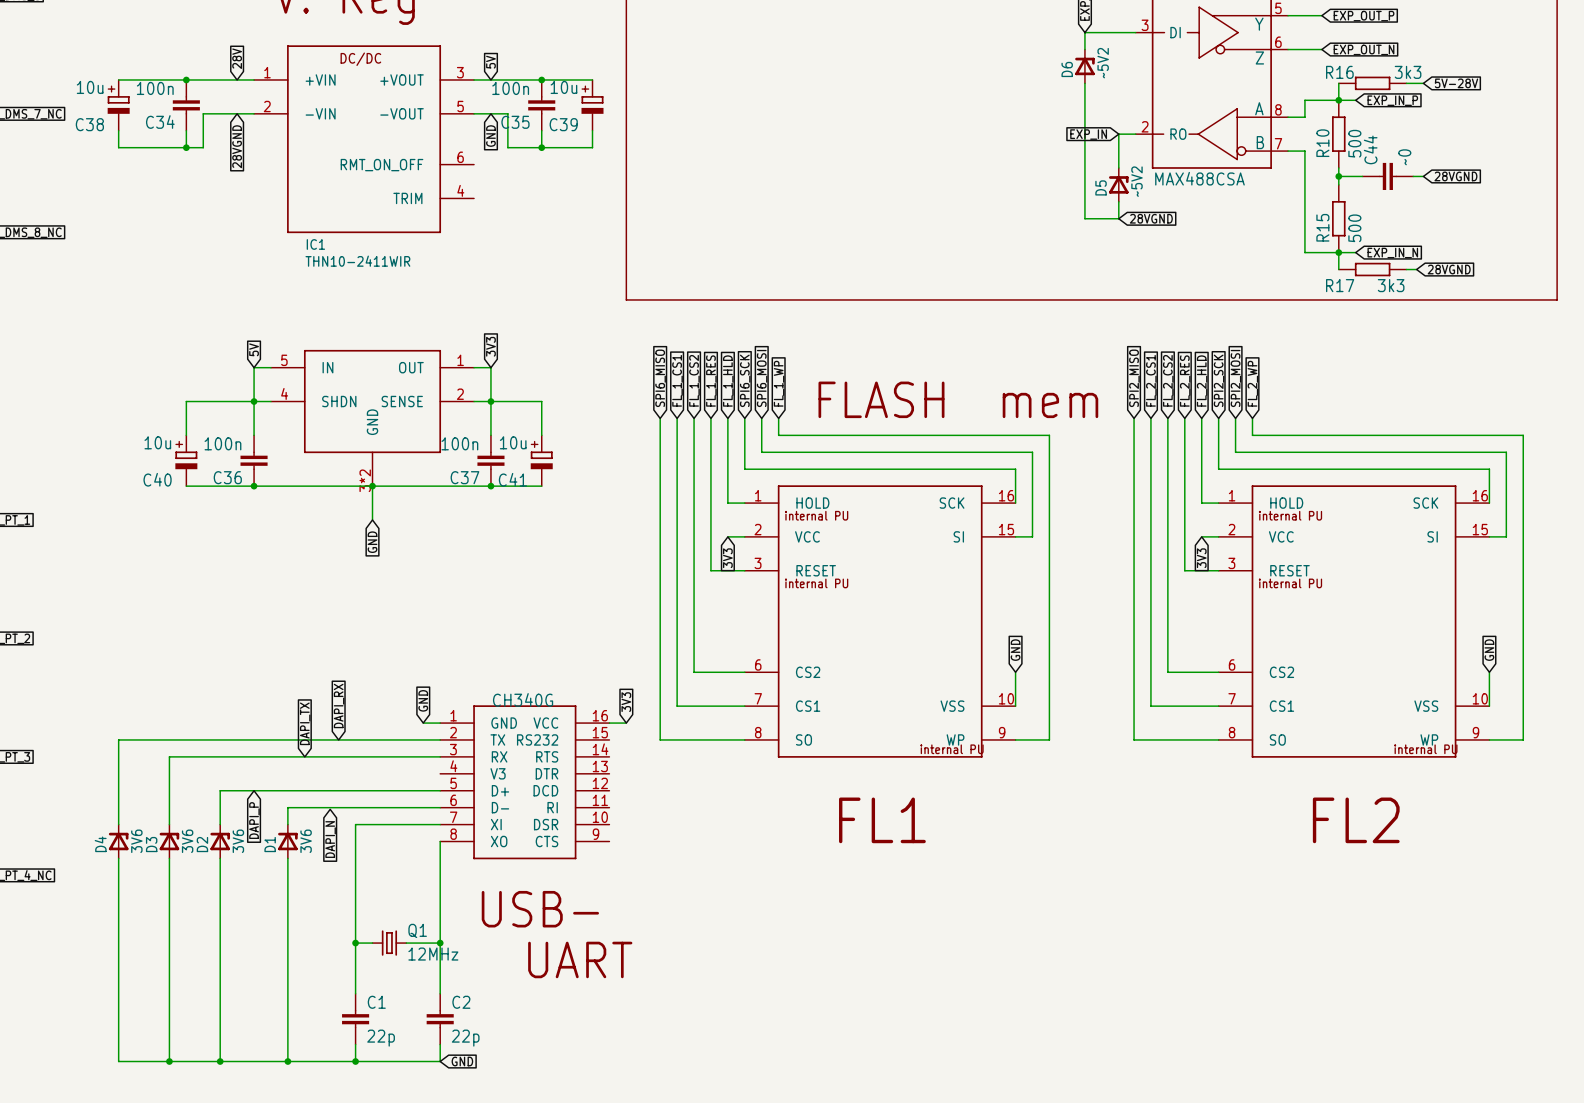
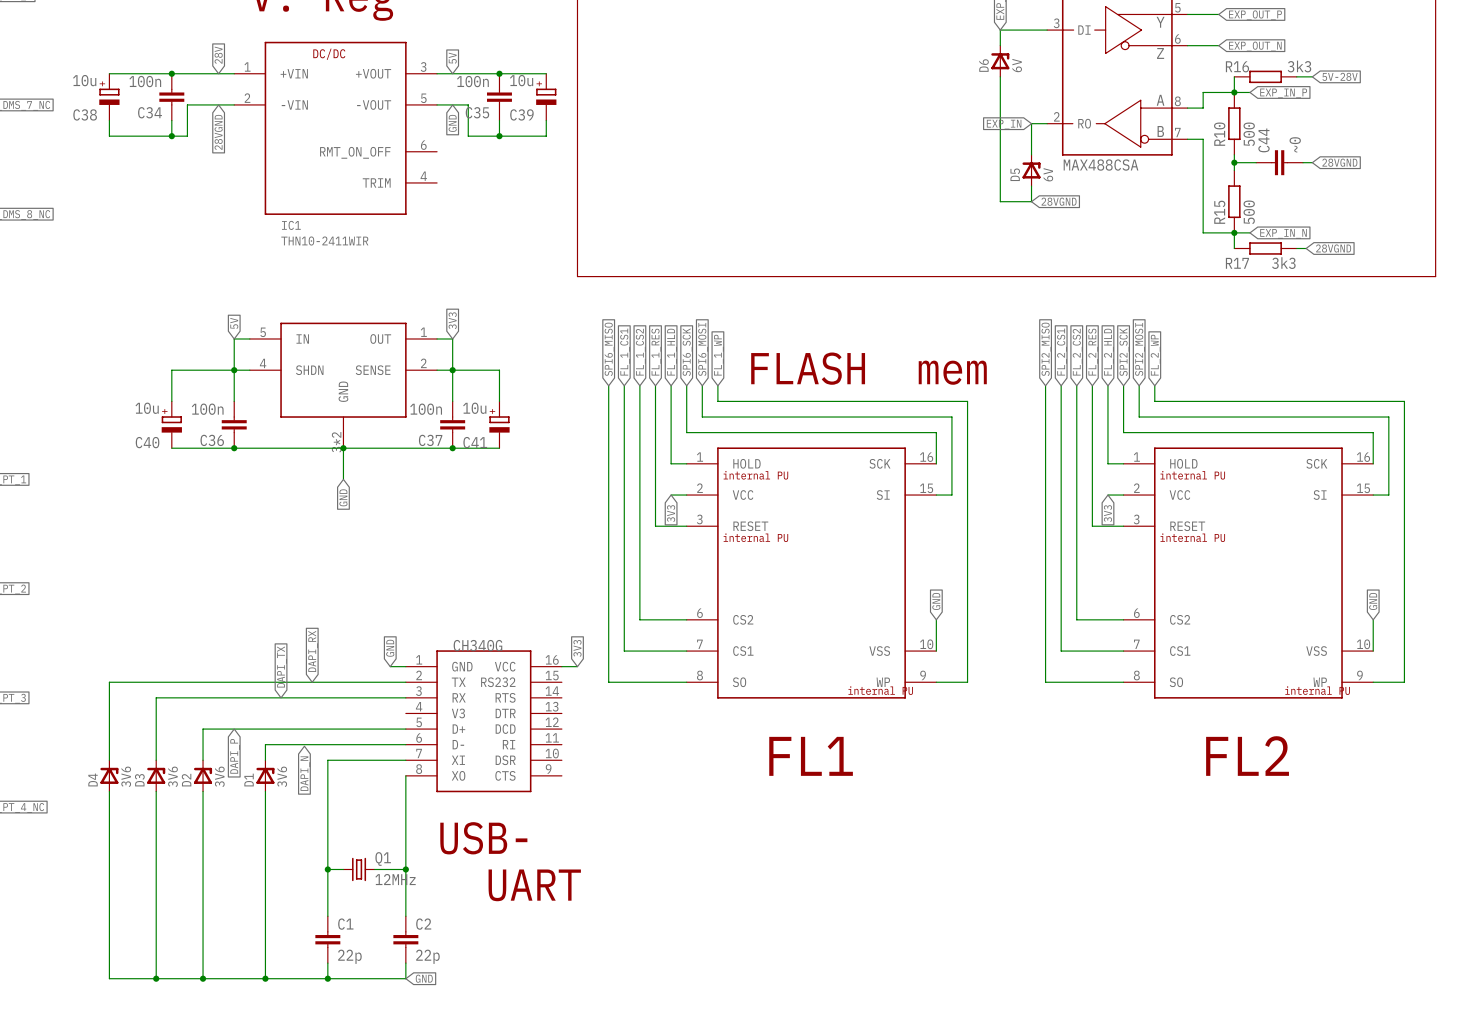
D6 value: ~5V2 (1103, 63) -> 6V (1017, 65)
D5 value: ~5V2 (1136, 181) -> 6V (1048, 174)

